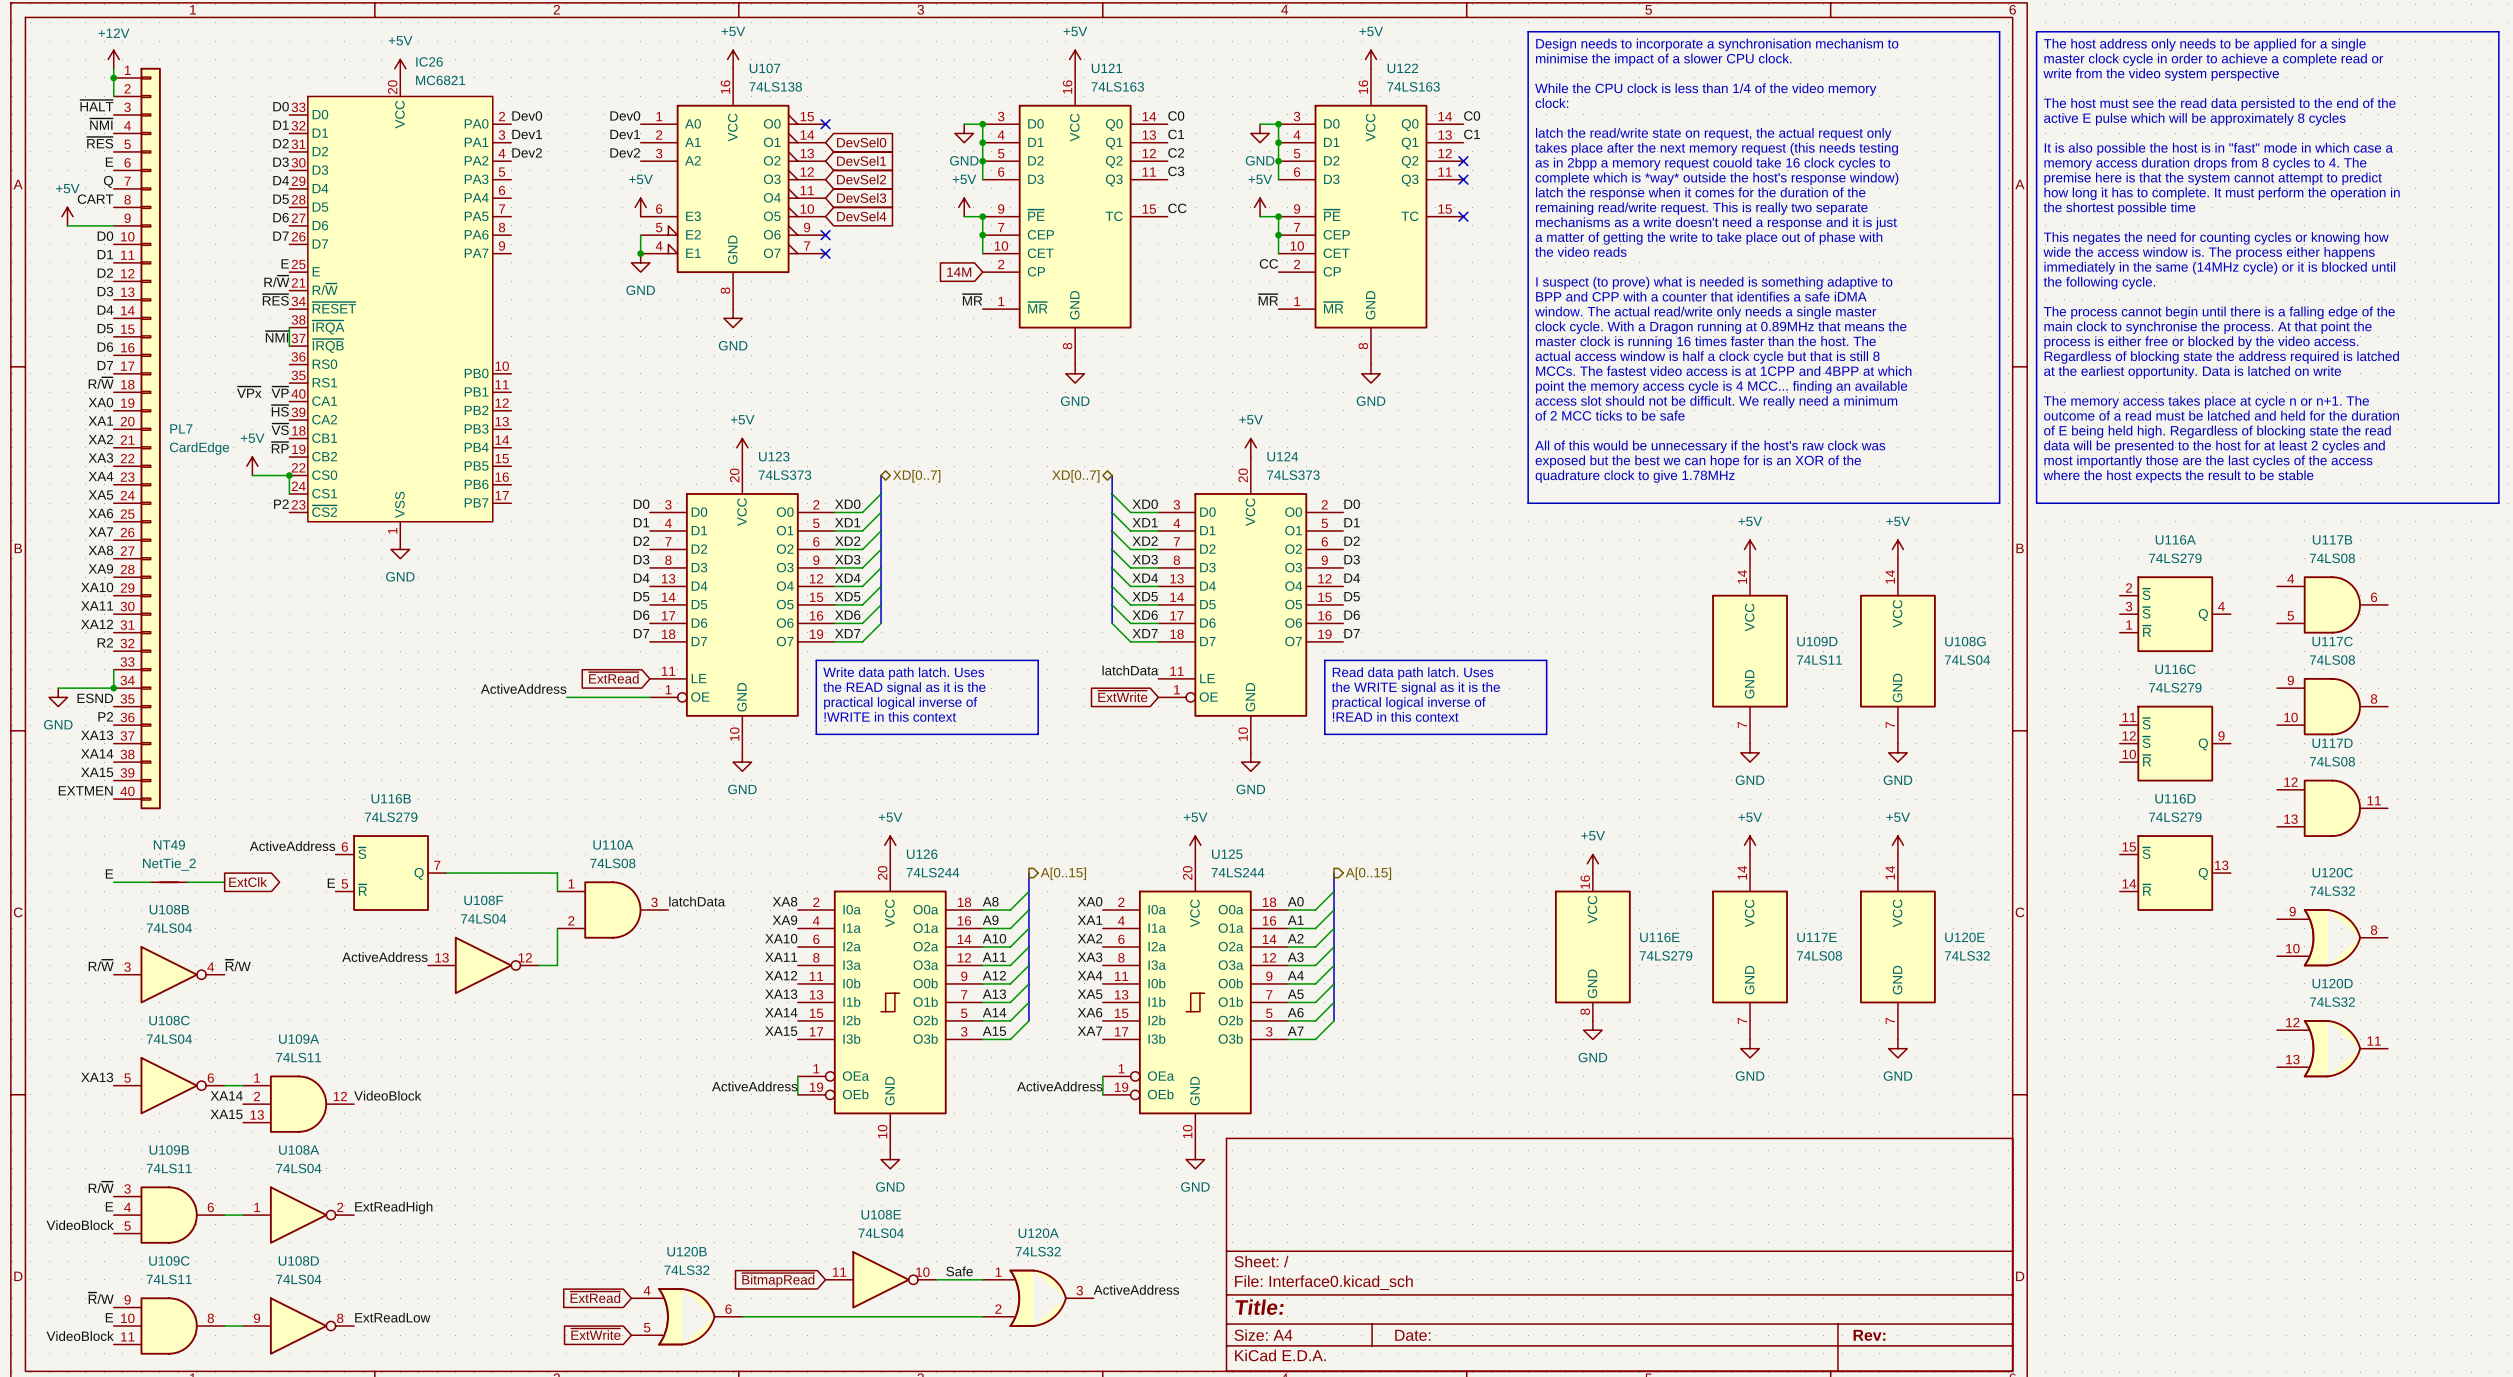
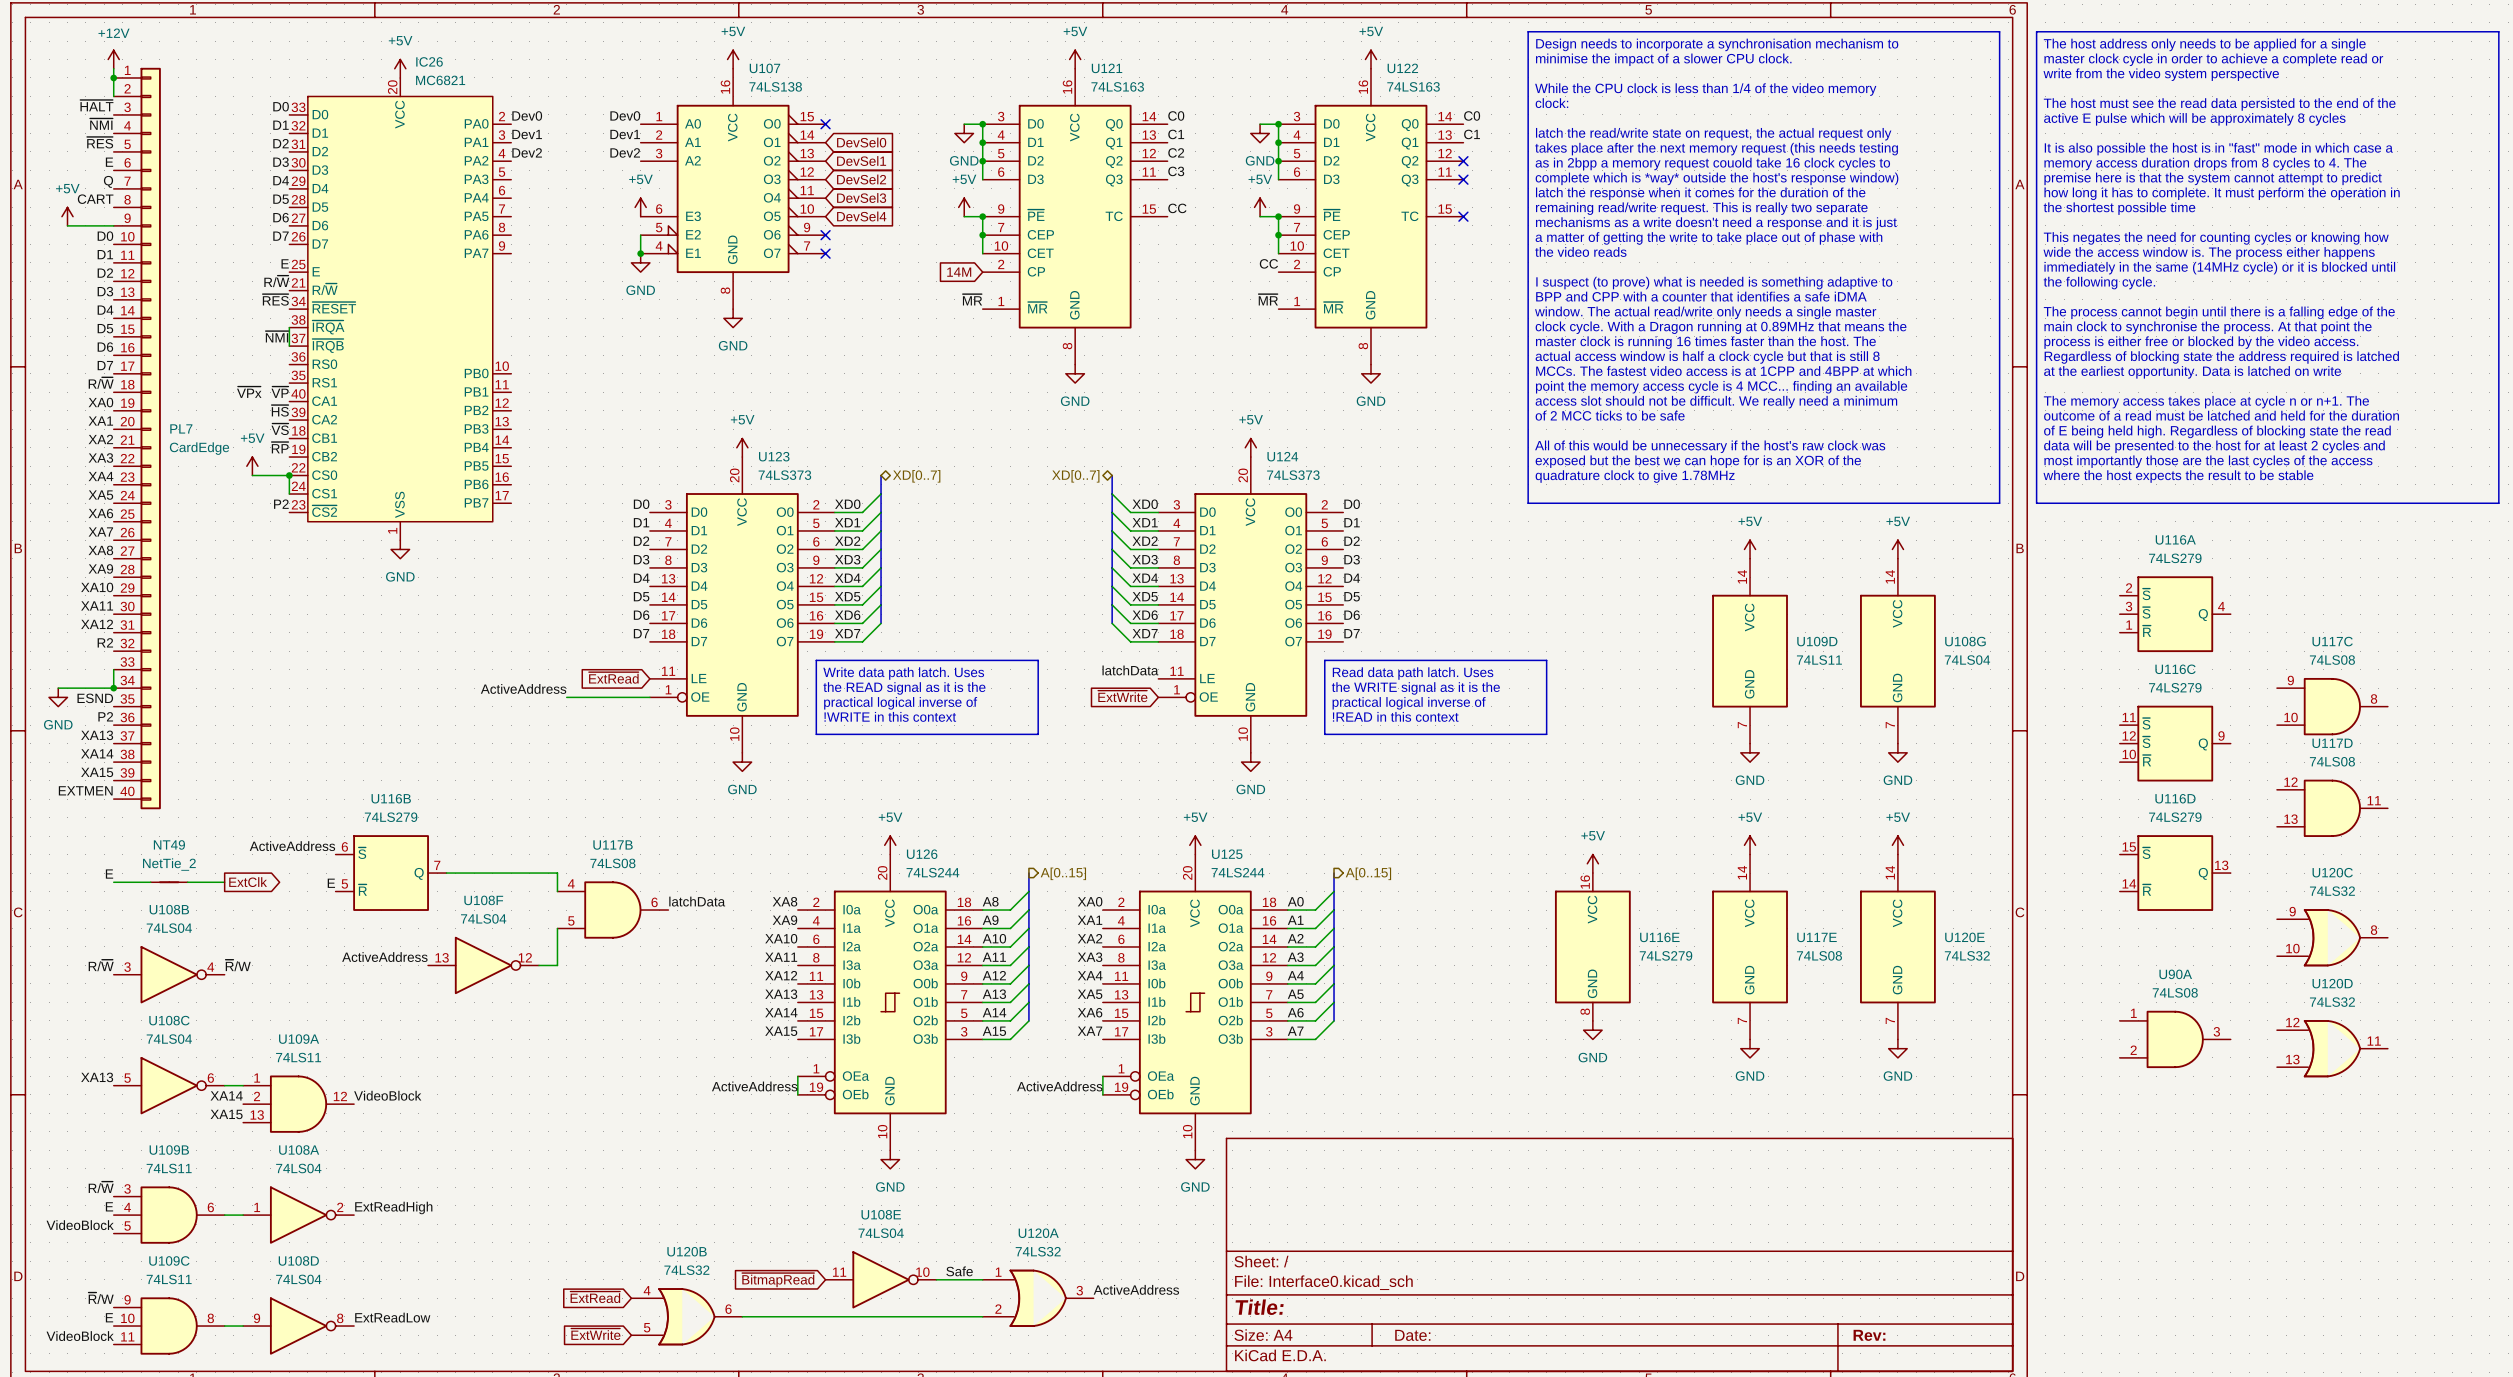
U117B position: (2332, 604) -> (612, 910)
U110A: 74LS08 (612, 910) -> none
U90A: none -> 74LS08 (2175, 1039)

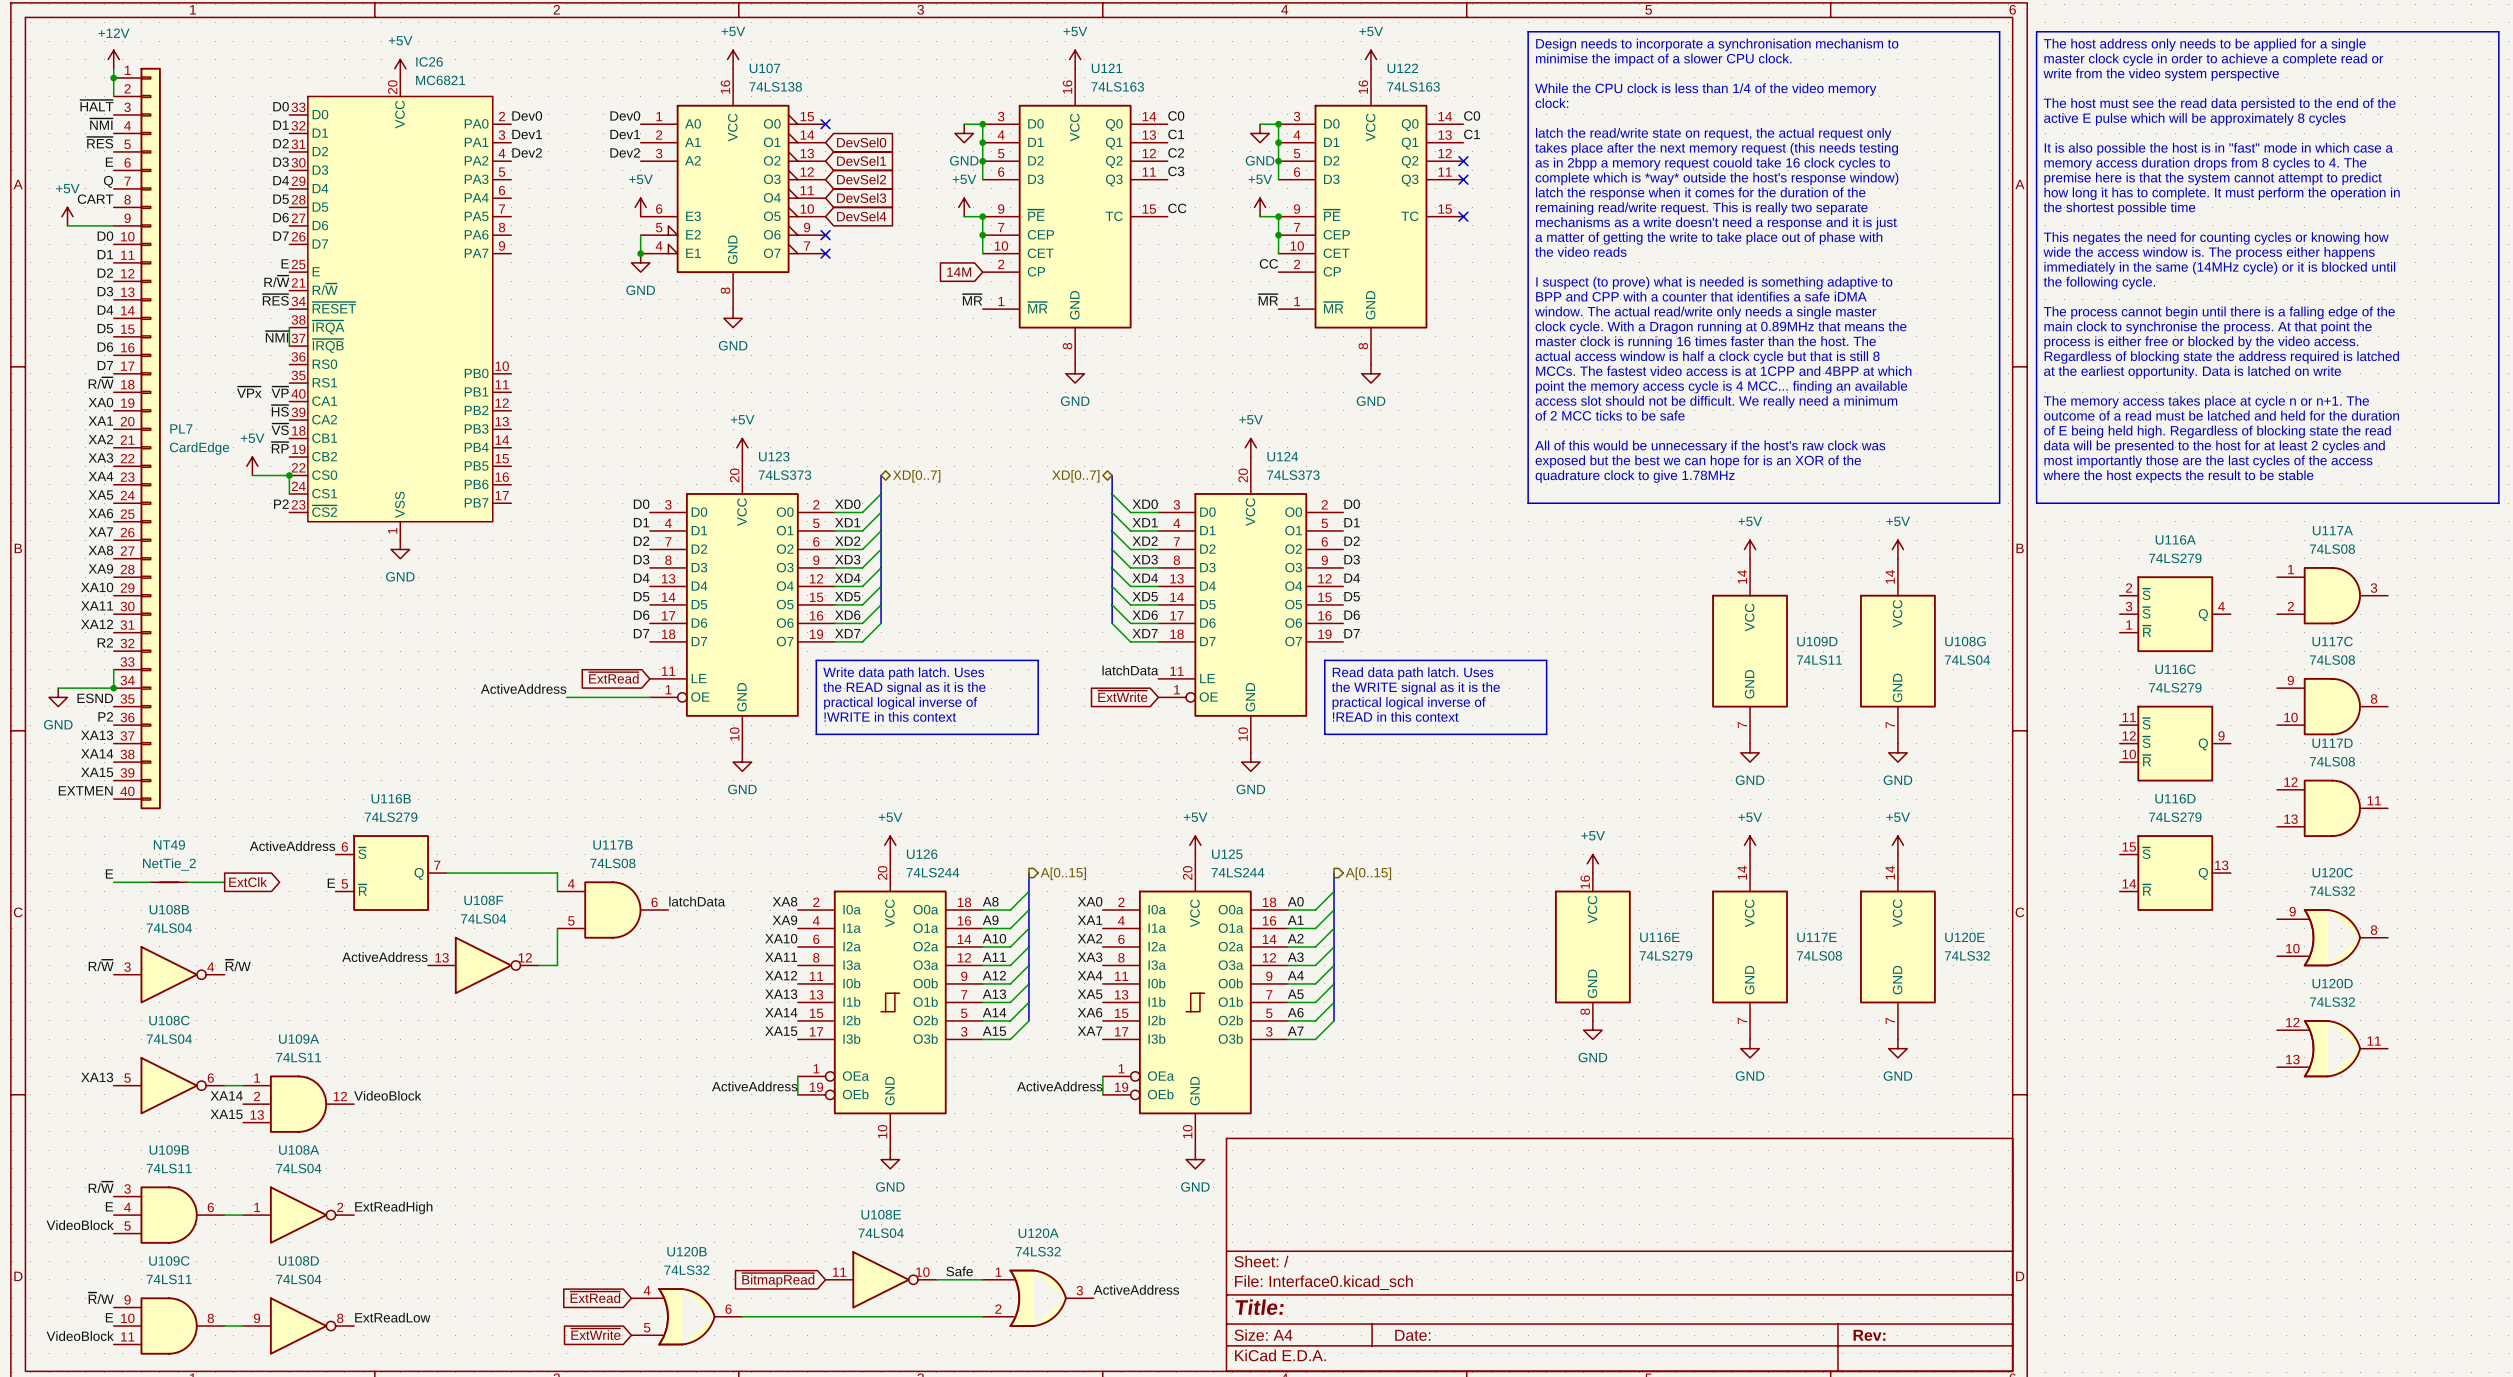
U117A: none -> 74LS08 (2332, 595)
U90A: 74LS08 (2175, 1039) -> none

